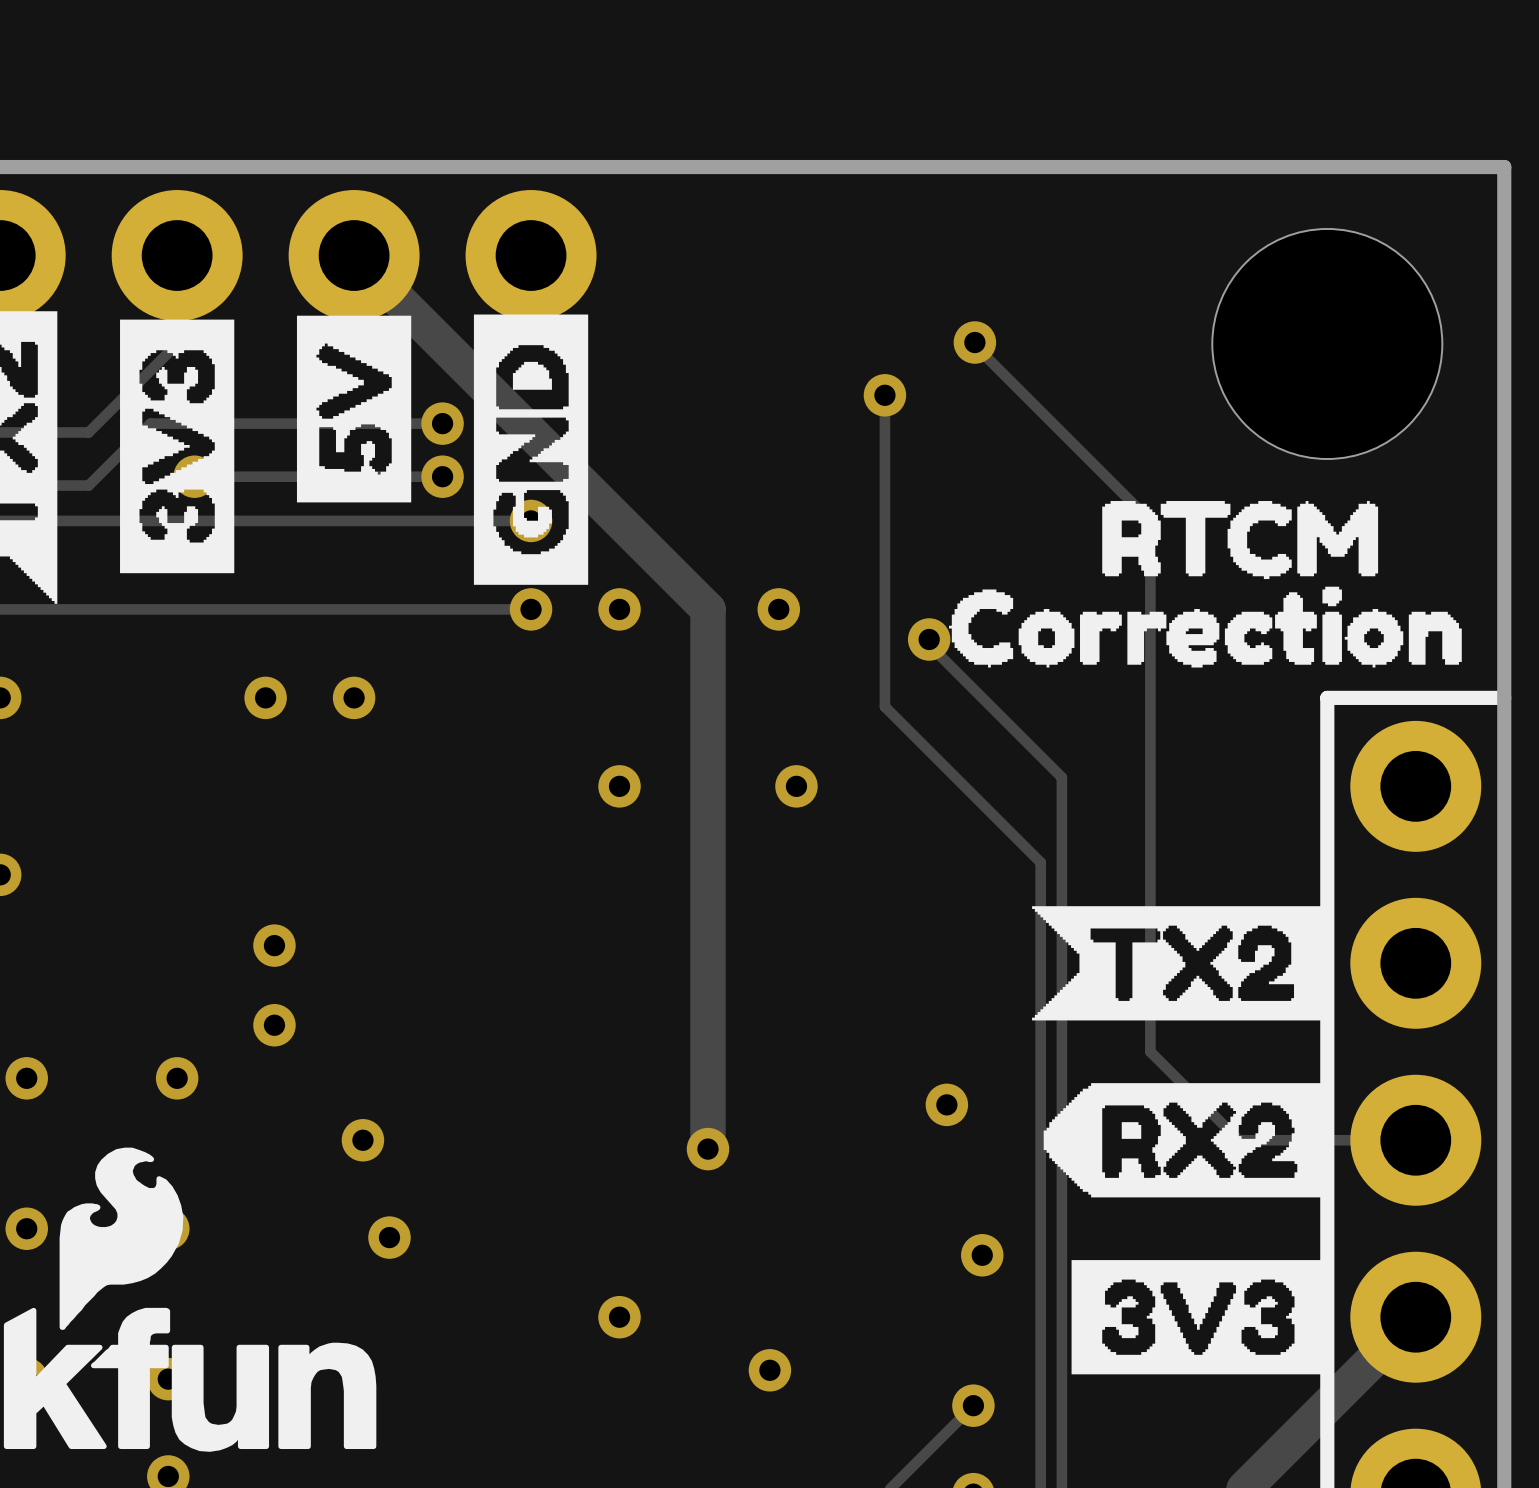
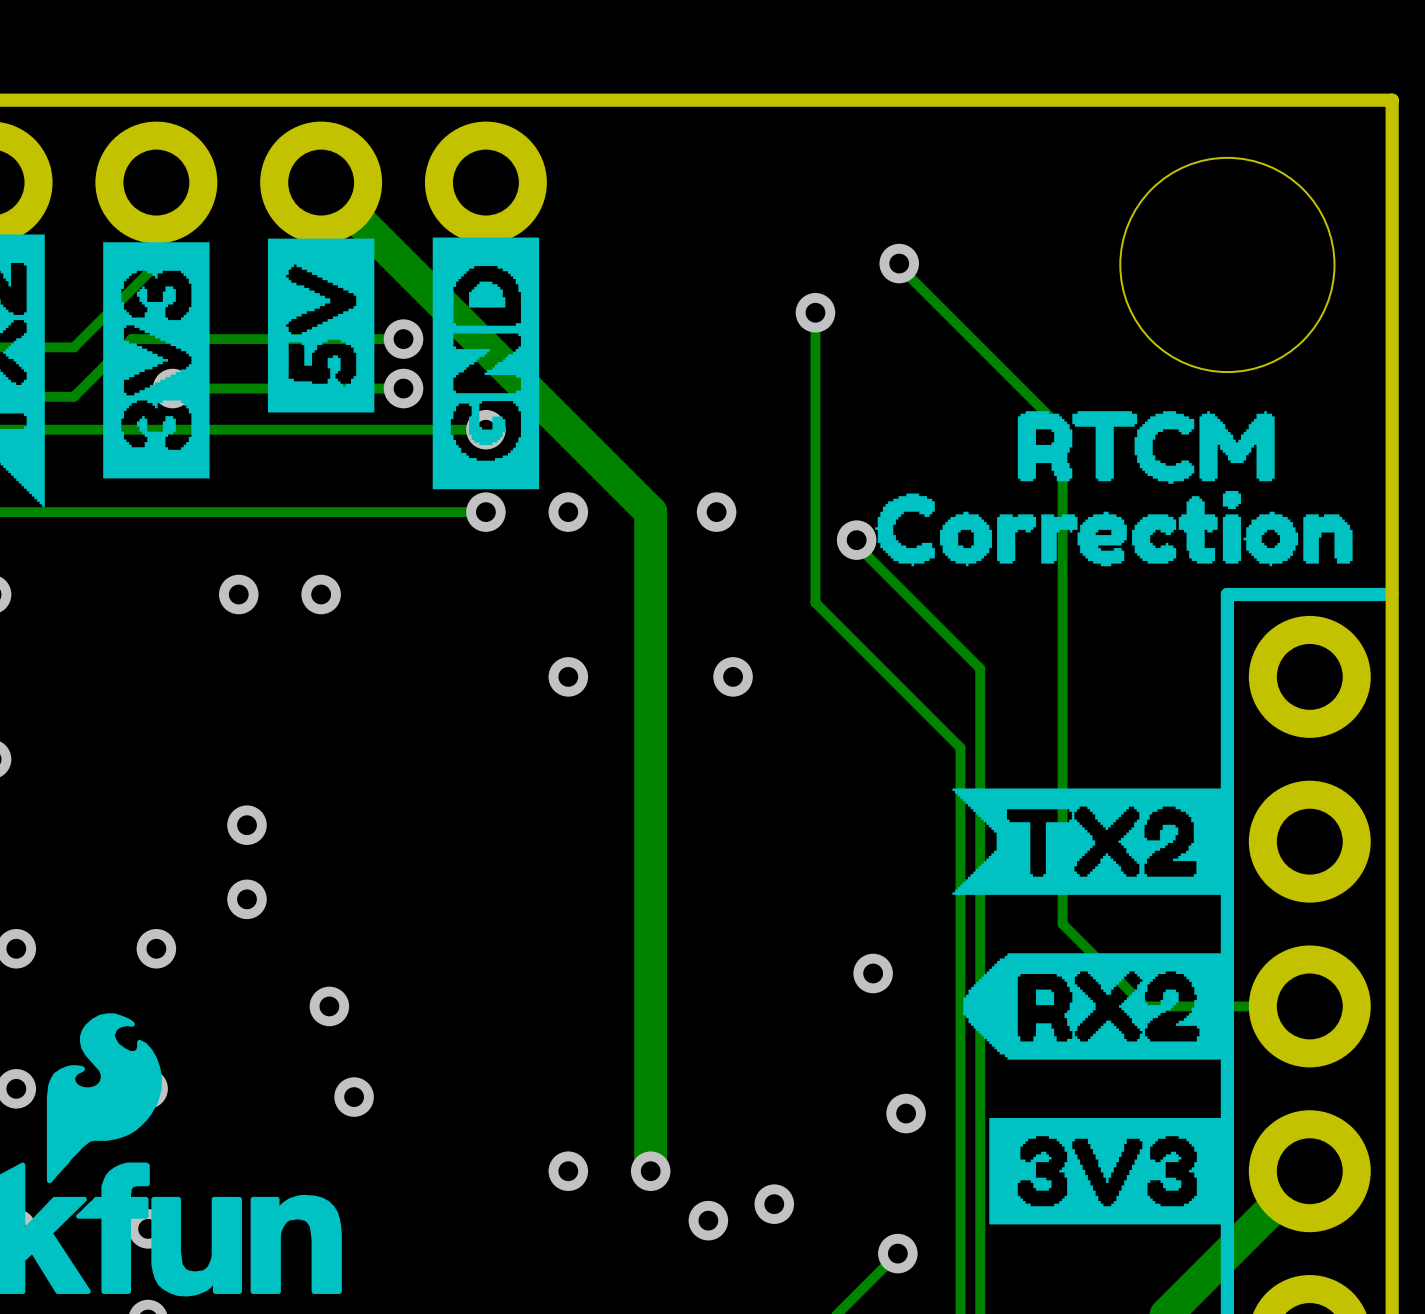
track: none -> (650, 1014) (650, 1171)
via: (707, 1149) -> none
via: none -> (650, 1171)
via: none -> (774, 1204)

